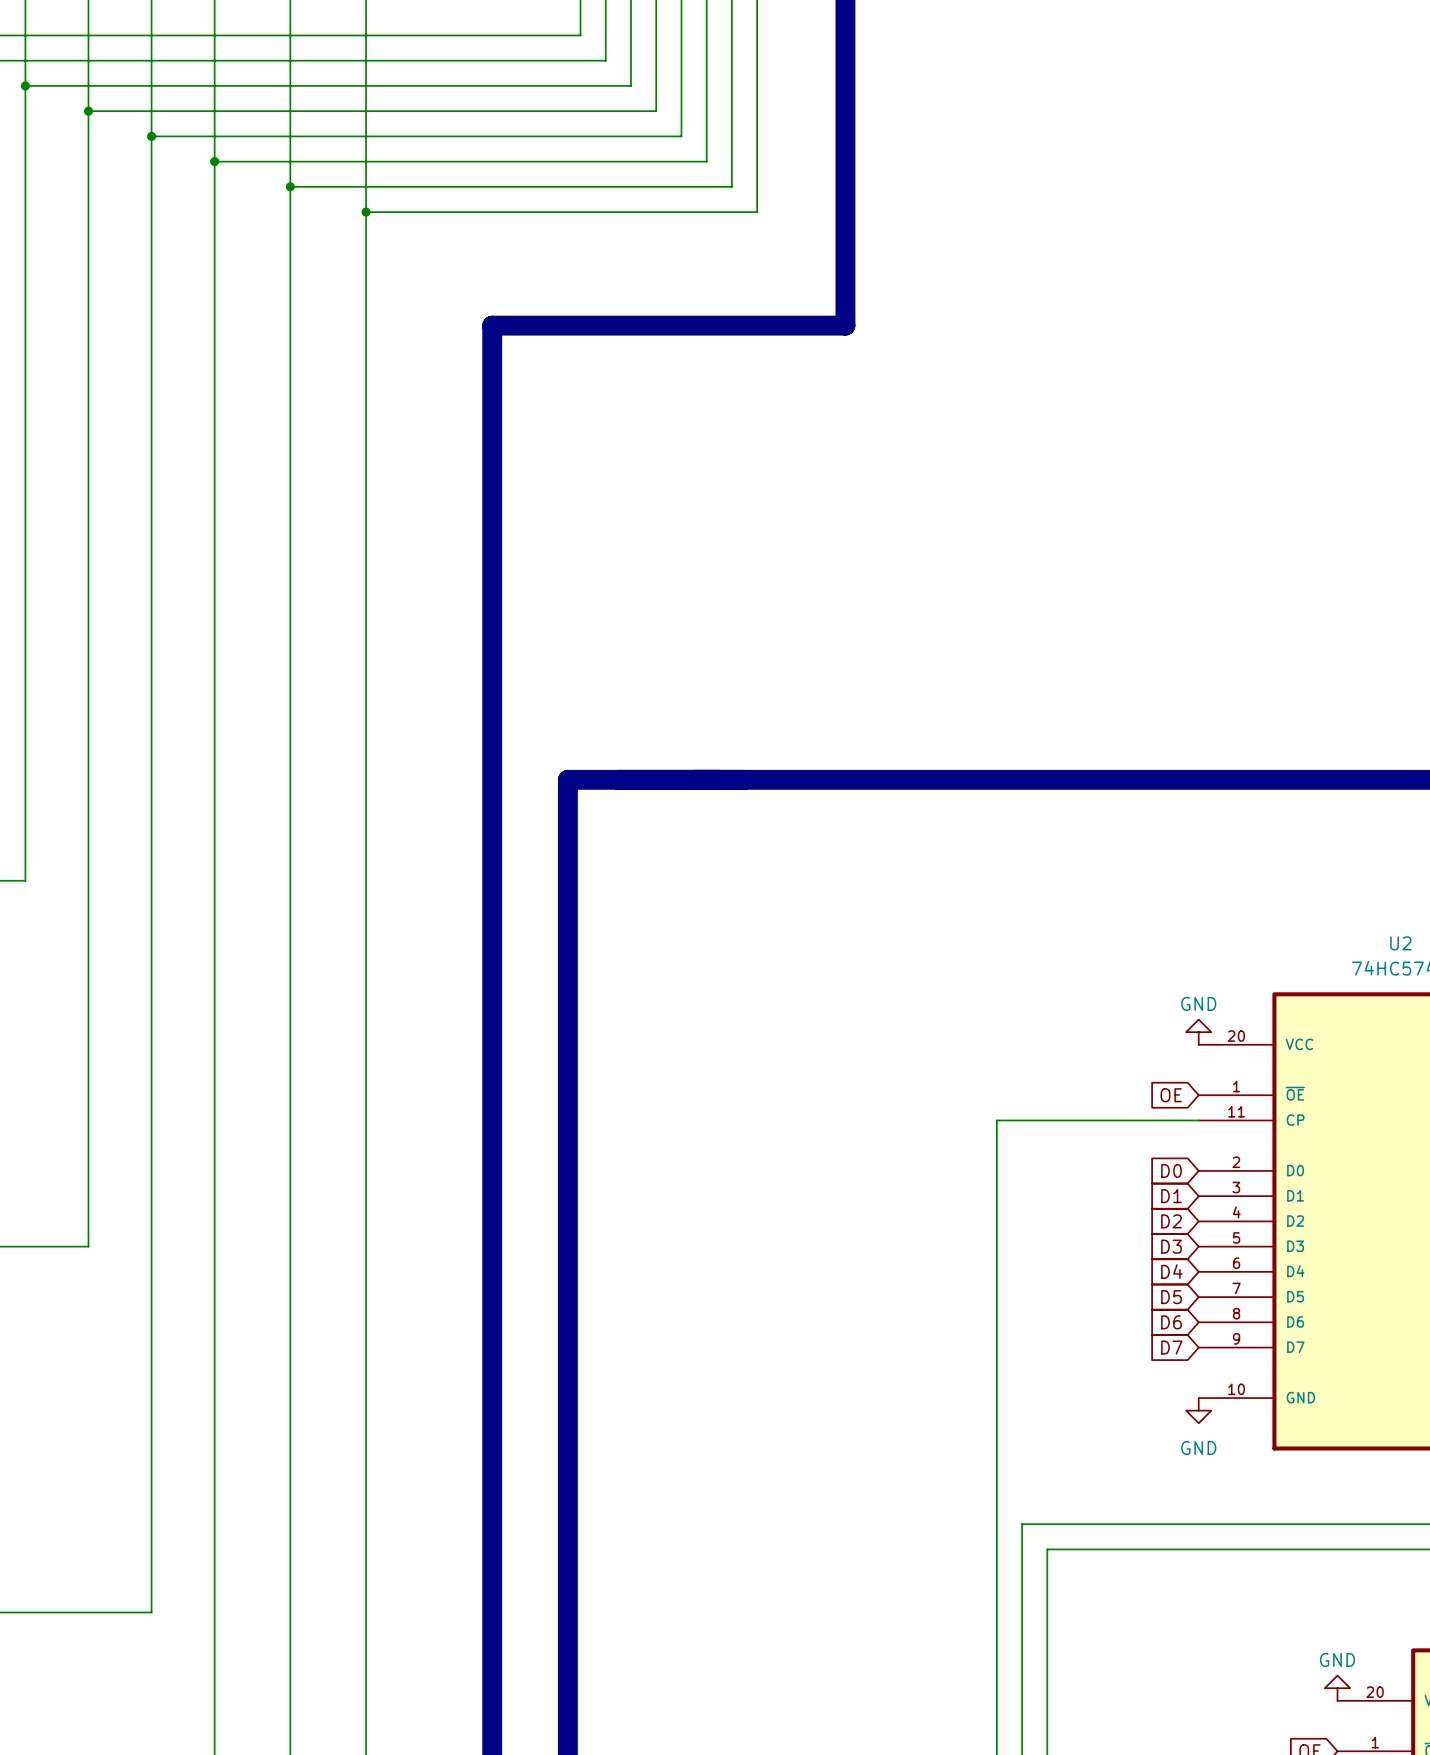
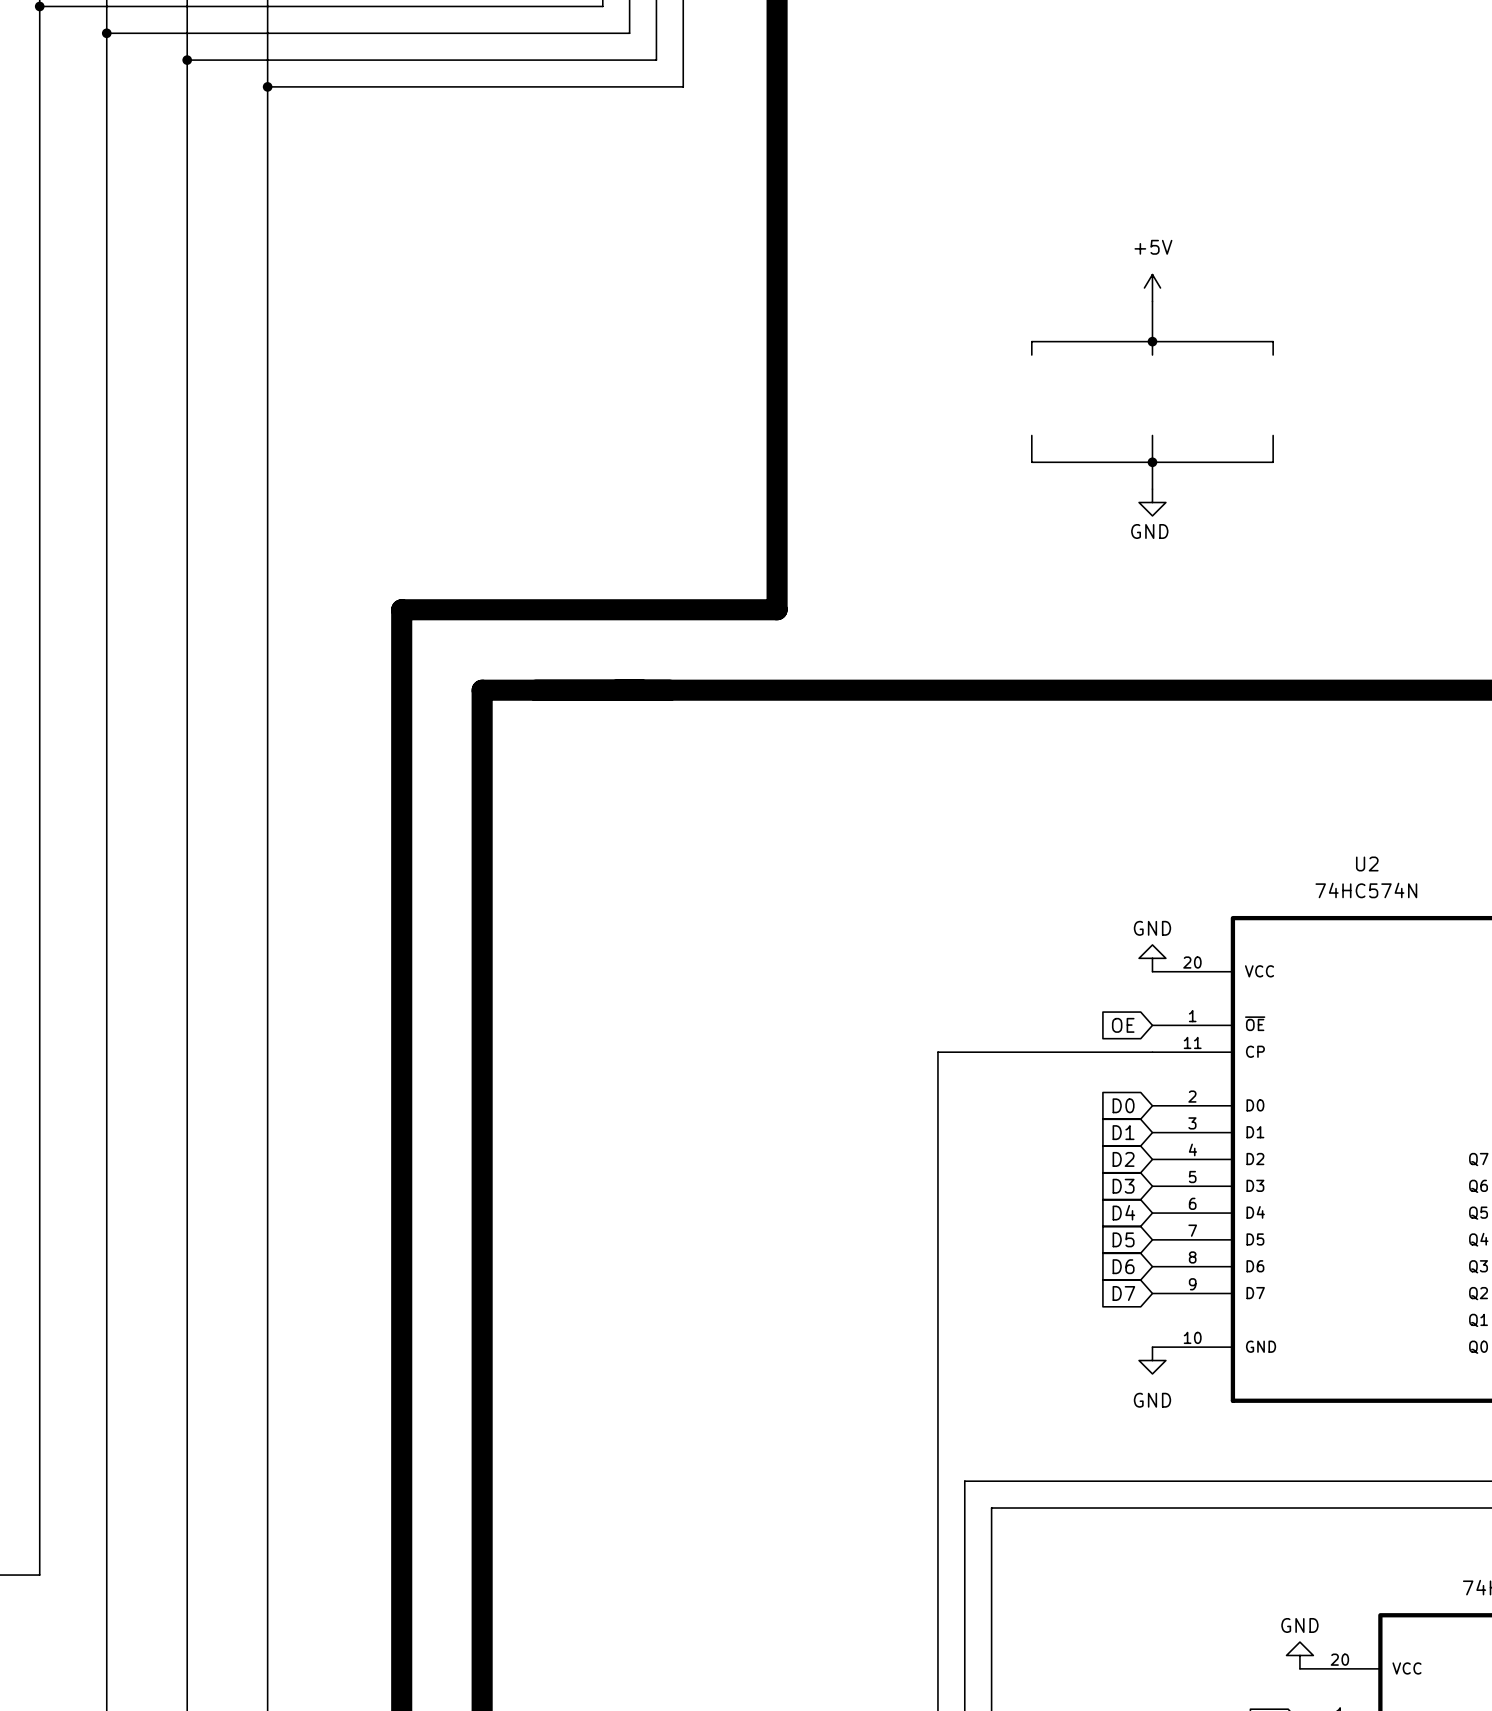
line: (845, 325) (492, 325) (492, 704) -> (777, 609) (401, 609)
power symbol: none -> +5V (1152, 288)
wire: none -> (1152, 301) (1152, 355)
junction: none -> (1152, 341)
wire: none -> (1031, 355) (1031, 341) (1273, 341) (1273, 355)
wire: none -> (1031, 435) (1031, 462) (1273, 462) (1273, 435)
wire: none -> (1152, 435) (1152, 489)
junction: none -> (1152, 462)
power symbol: none -> GND (1152, 502)
line: none -> (777, 609) (777, 207) (777, 609)

